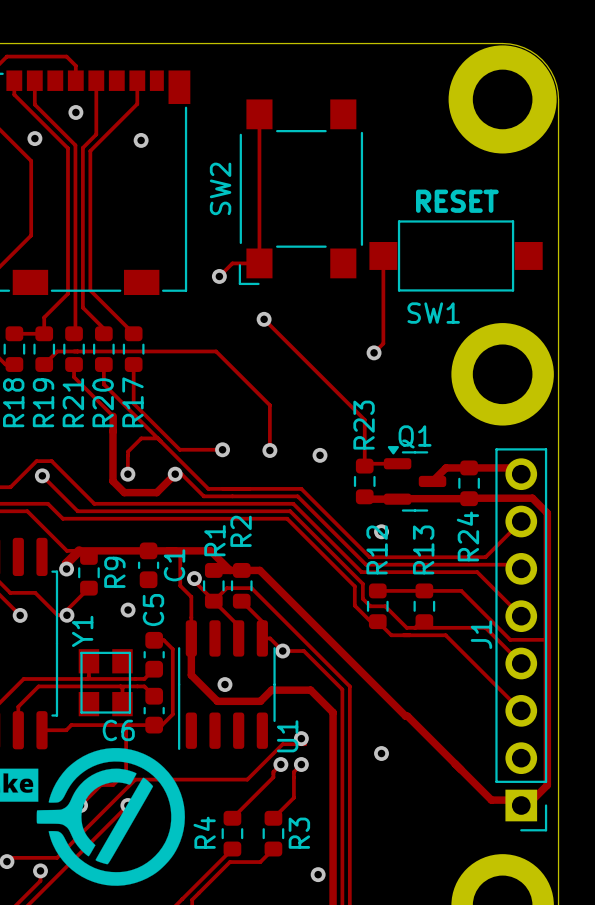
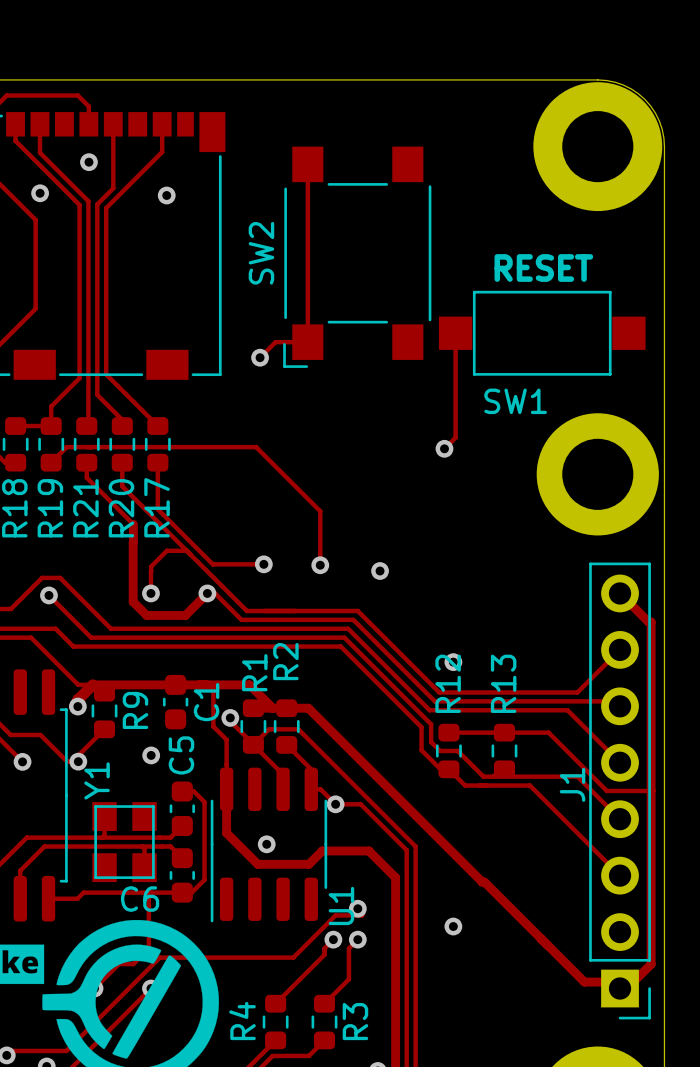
track: (264, 319) (364, 419) (364, 466) (367, 463) (397, 463) -> none
via: (264, 319) -> none
track: (521, 474) (515, 467) (446, 467) (432, 481) -> (620, 593) (648, 622) (651, 622) (651, 639)
Q1: (415, 478) -> none
R23: (364, 481) -> none
R24: (469, 483) -> none
track: (364, 496) (367, 499) (532, 498) (547, 513) -> none

